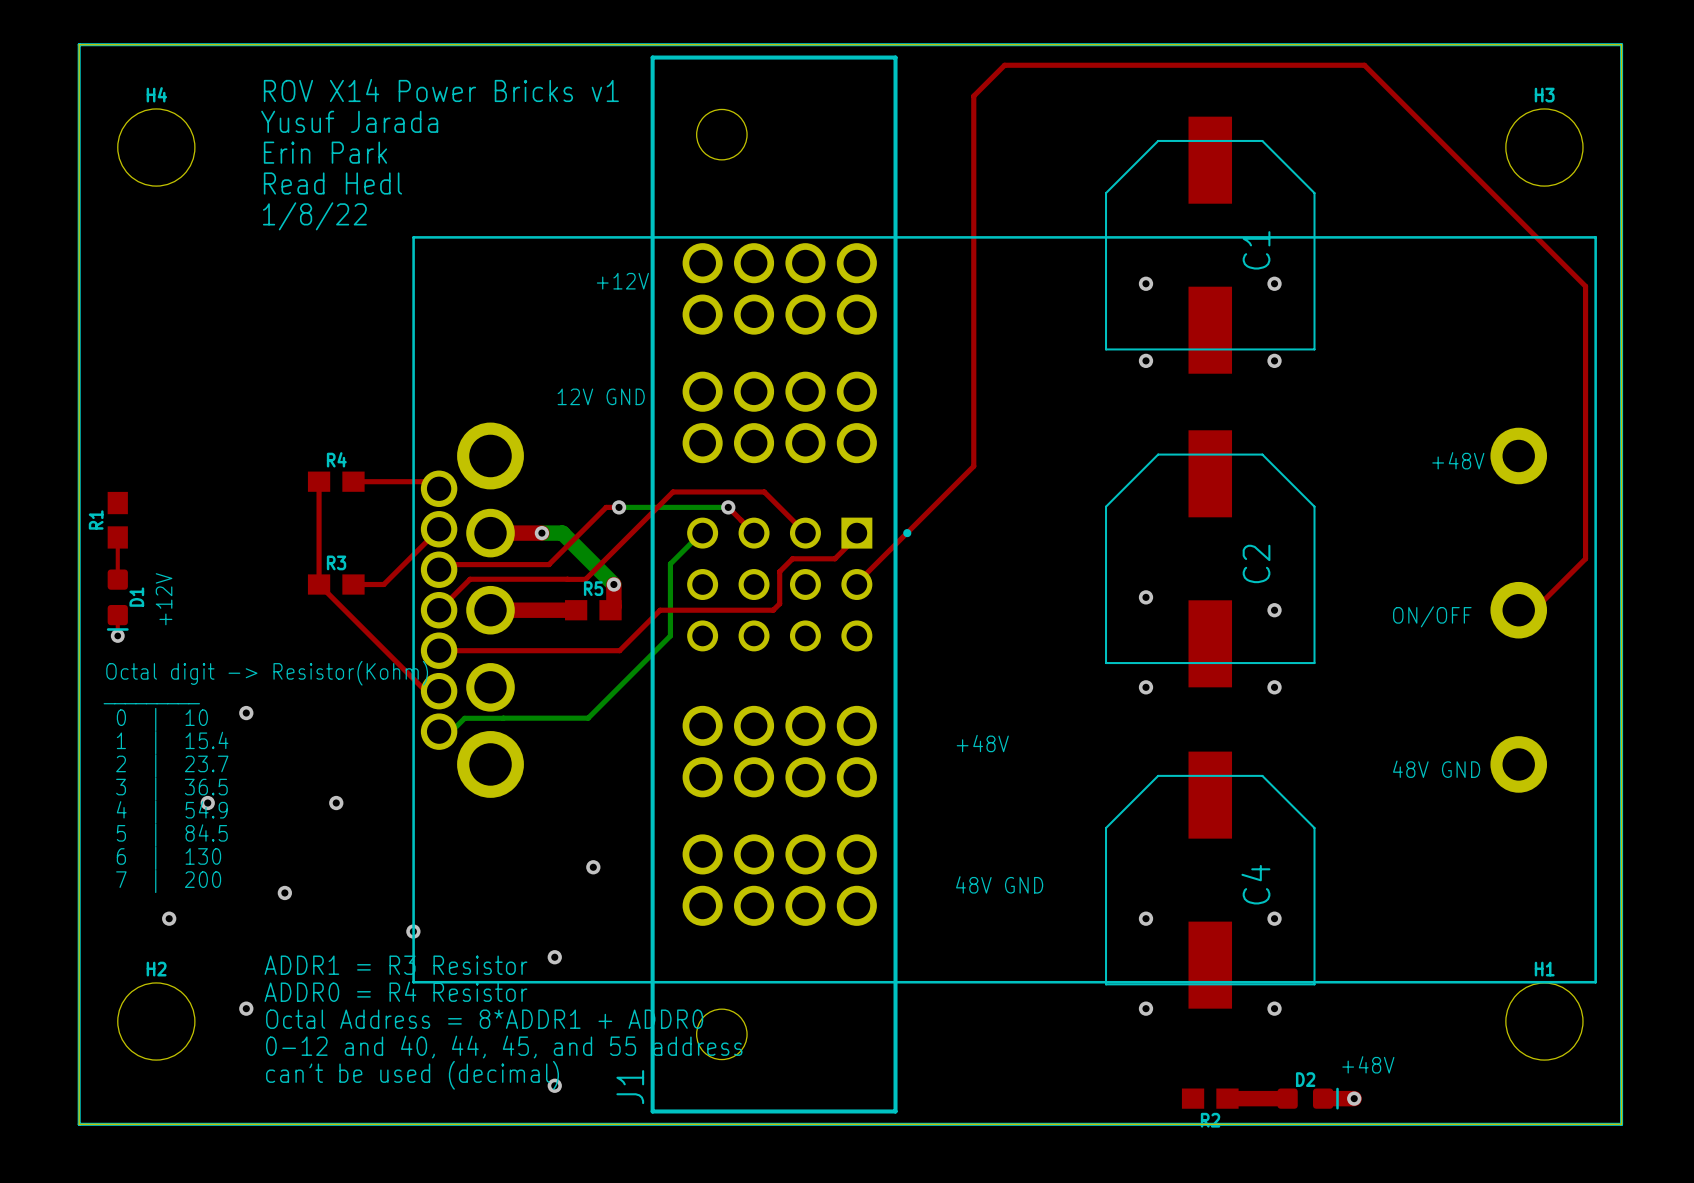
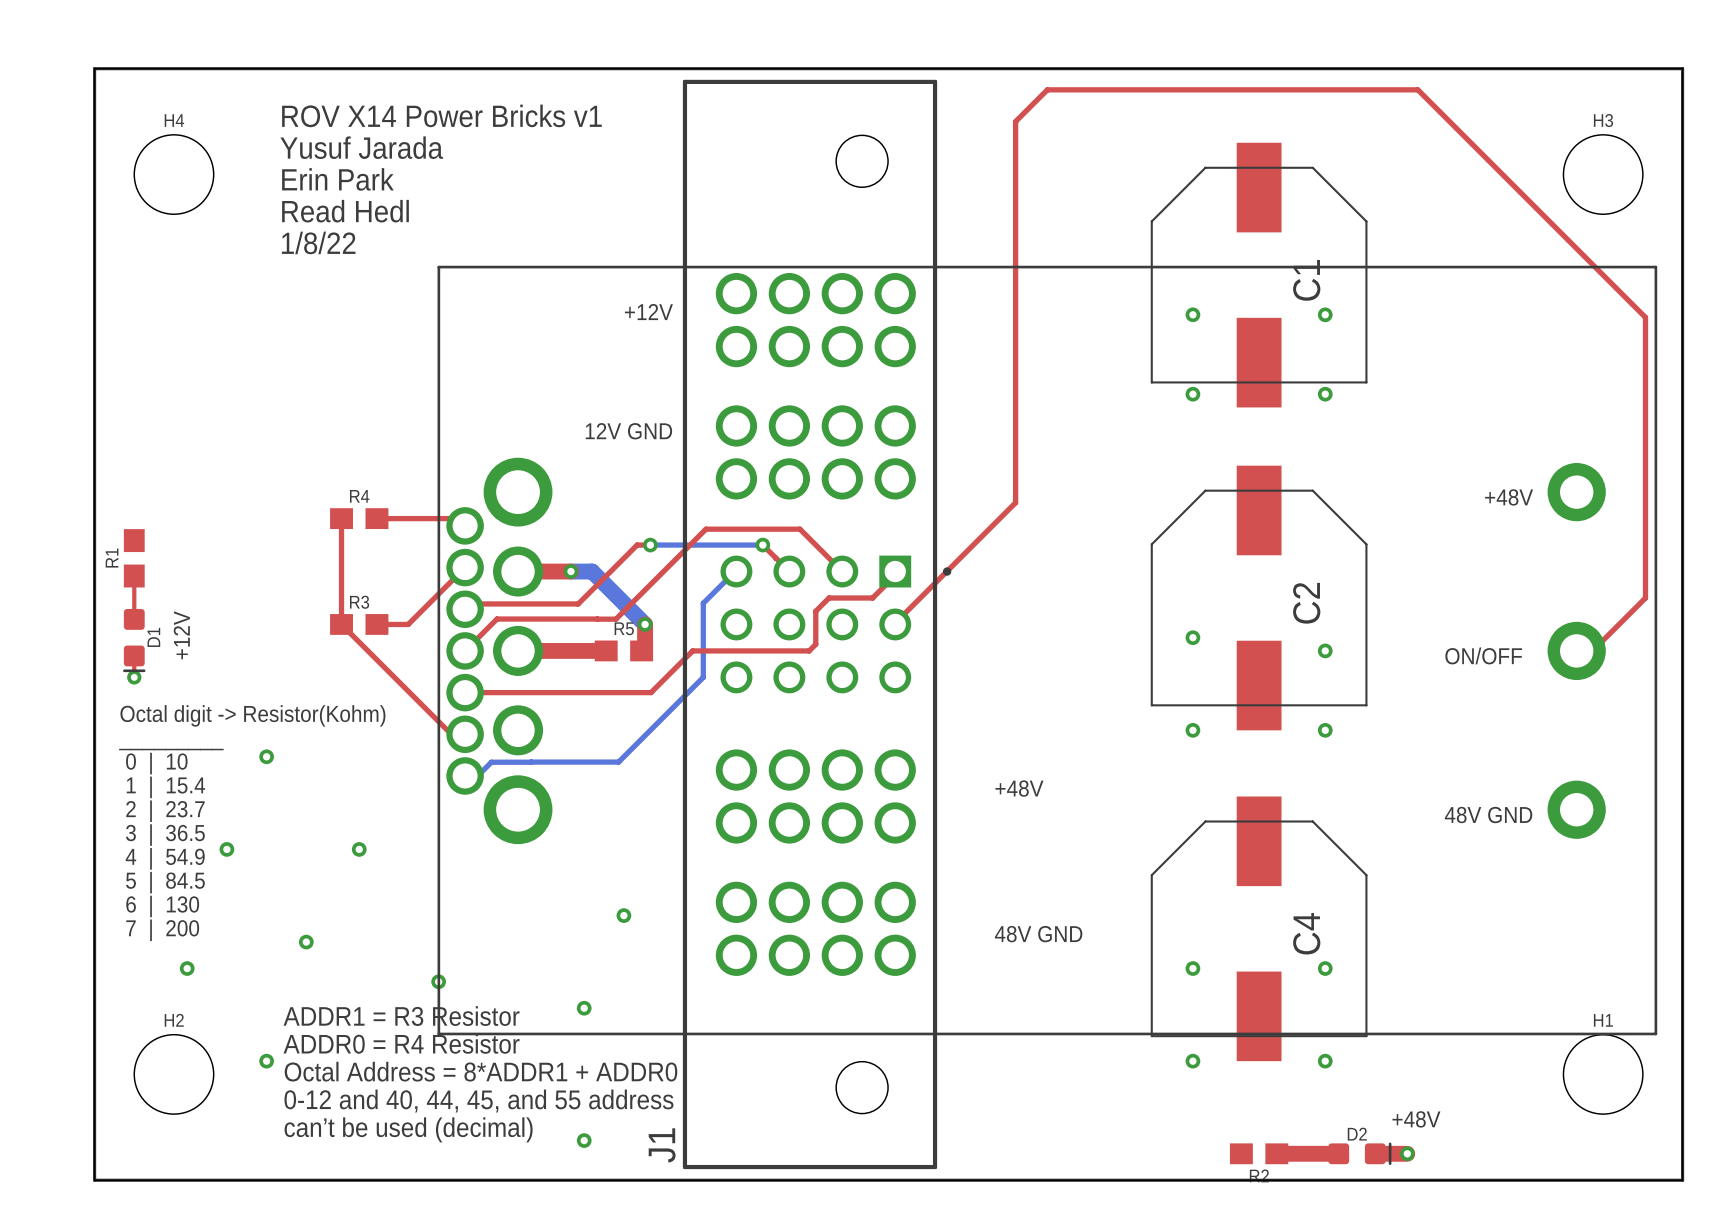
J1 footprint: [77, 43, 1624, 1126] -> [92, 67, 1685, 1182]

